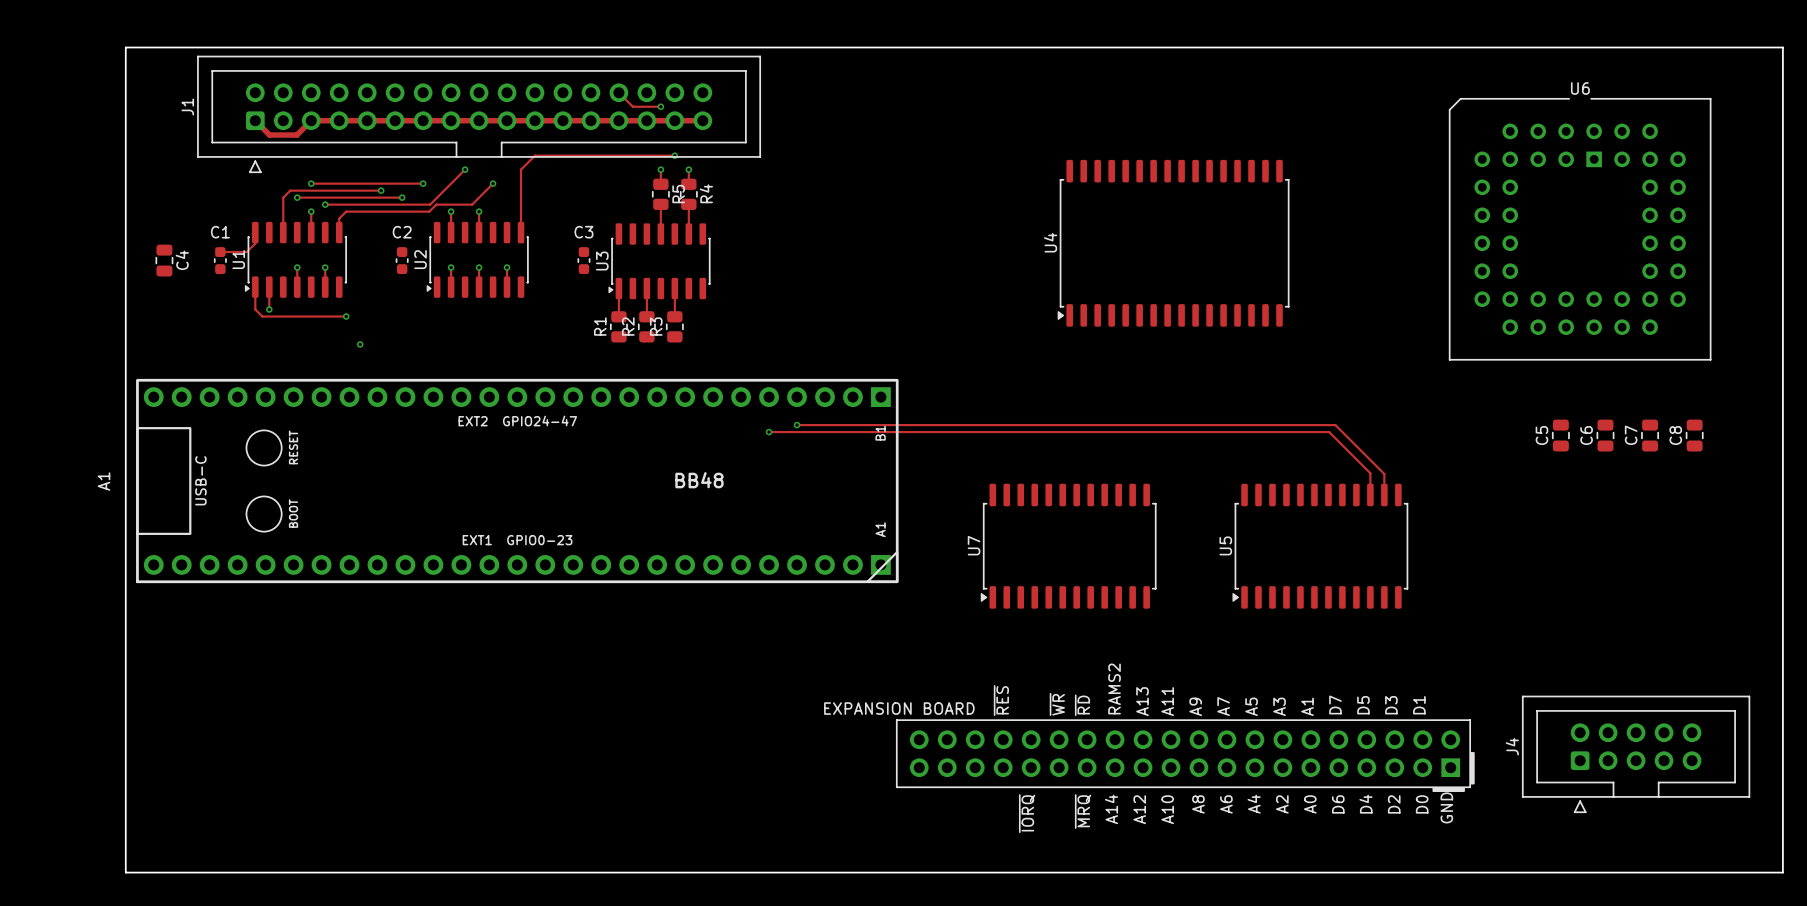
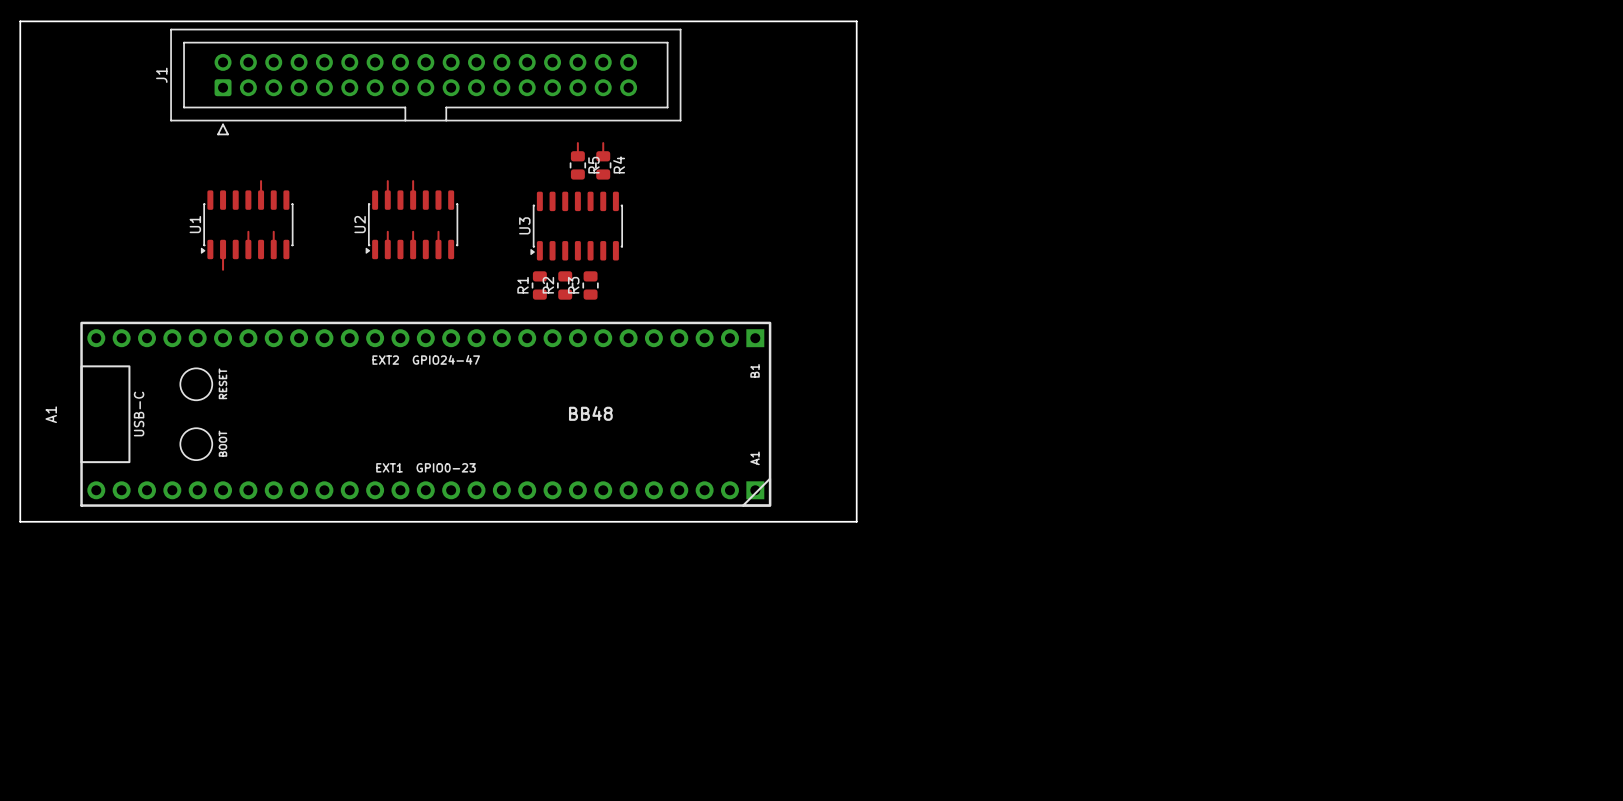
board edge: none -> (20, 21) (856, 21) (856, 521) (20, 521) (20, 21)
board edge: (125, 47) (1782, 47) (1782, 872) (125, 872) (125, 47) -> none
track: (618, 92) (632, 106) (660, 106) -> none
via: (660, 106) -> none
J1 position: (479, 114) -> (425, 81)
track: (255, 120) (269, 135) (296, 135) (311, 120) (702, 120) -> none
track: (674, 155) (535, 155) (521, 169) (521, 232) -> none
via: (674, 155) -> none
track: (465, 169) (430, 204) (325, 204) -> none
via: (465, 169) -> none
via: (660, 169) -> none
via: (688, 169) -> none
track: (311, 183) (423, 183) -> none
via: (311, 183) -> none
via: (423, 183) -> none
track: (493, 183) (472, 204) (436, 204) (429, 211) (346, 211) (339, 218) (339, 232) -> none
via: (493, 183) -> none
track: (381, 190) (290, 190) (283, 197) (283, 232) -> none
via: (381, 190) -> none
track: (297, 197) (402, 197) -> none
via: (297, 197) -> none
via: (402, 197) -> none
via: (325, 204) -> none
track: (660, 204) (660, 234) -> none
track: (688, 204) (688, 234) -> none
via: (311, 211) -> none
via: (451, 211) -> none
via: (479, 211) -> none
U6: (1580, 229) -> none
track: (255, 232) (255, 243) (246, 252) (220, 252) -> none
U4: (1173, 243) -> none
C4: (164, 260) -> none
C1: (220, 260) -> none
C2: (402, 260) -> none
C3: (583, 260) -> none
via: (297, 267) -> none
via: (325, 267) -> none
via: (451, 267) -> none
via: (479, 267) -> none
via: (507, 267) -> none
track: (255, 287) (255, 309) (262, 316) (346, 316) -> none
track: (618, 288) (618, 316) -> none
track: (646, 288) (646, 316) -> none
track: (674, 288) (674, 316) -> none
via: (269, 309) -> none
via: (346, 316) -> none
via: (360, 344) -> none
track: (797, 425) (1335, 425) (1384, 474) (1384, 495) -> none
via: (797, 425) -> none
track: (769, 432) (1329, 432) (1370, 473) (1370, 495) -> none
via: (769, 432) -> none
C5: (1560, 435) -> none
C6: (1605, 435) -> none
C7: (1650, 435) -> none
C8: (1694, 435) -> none
A1 position: (517, 481) -> (425, 414)
U7: (1068, 546) -> none
U5: (1320, 546) -> none
text: RAMS2 (1114, 688) -> none
text: ~{RES} (1001, 700) -> none
text: A13 (1142, 701) -> none
text: A11 (1167, 701) -> none
text: ~{WR} (1057, 704) -> none
text: D7 (1335, 704) -> none
text: ~{RD} (1082, 705) -> none
text: D5 (1363, 705) -> none
text: D3 (1391, 705) -> none
text: D1 (1419, 705) -> none
text: A9 (1195, 706) -> none
text: A7 (1223, 706) -> none
text: A5 (1251, 706) -> none
text: A3 (1279, 706) -> none
text: A1 (1307, 706) -> none
text: EXPANSION BOARD (899, 708) -> none
line: (896, 720) (1470, 720) (1470, 787) (896, 787) (896, 720) -> none
drawing: [1432, 752, 1475, 793] -> none
part: (1185, 753) -> none
J4: (1636, 754) -> none
text: A8 (1198, 804) -> none
text: A6 (1226, 804) -> none
text: A4 (1254, 804) -> none
text: A2 (1282, 804) -> none
text: A0 (1310, 804) -> none
text: D6 (1338, 804) -> none
text: D4 (1365, 804) -> none
text: D2 (1394, 804) -> none
text: D0 (1422, 804) -> none
text: GND (1446, 807) -> none
text: A14 (1111, 809) -> none
text: A12 (1139, 809) -> none
text: A10 (1167, 809) -> none
text: ~{MRQ} (1083, 811) -> none
text: ~{IORQ} (1027, 813) -> none

